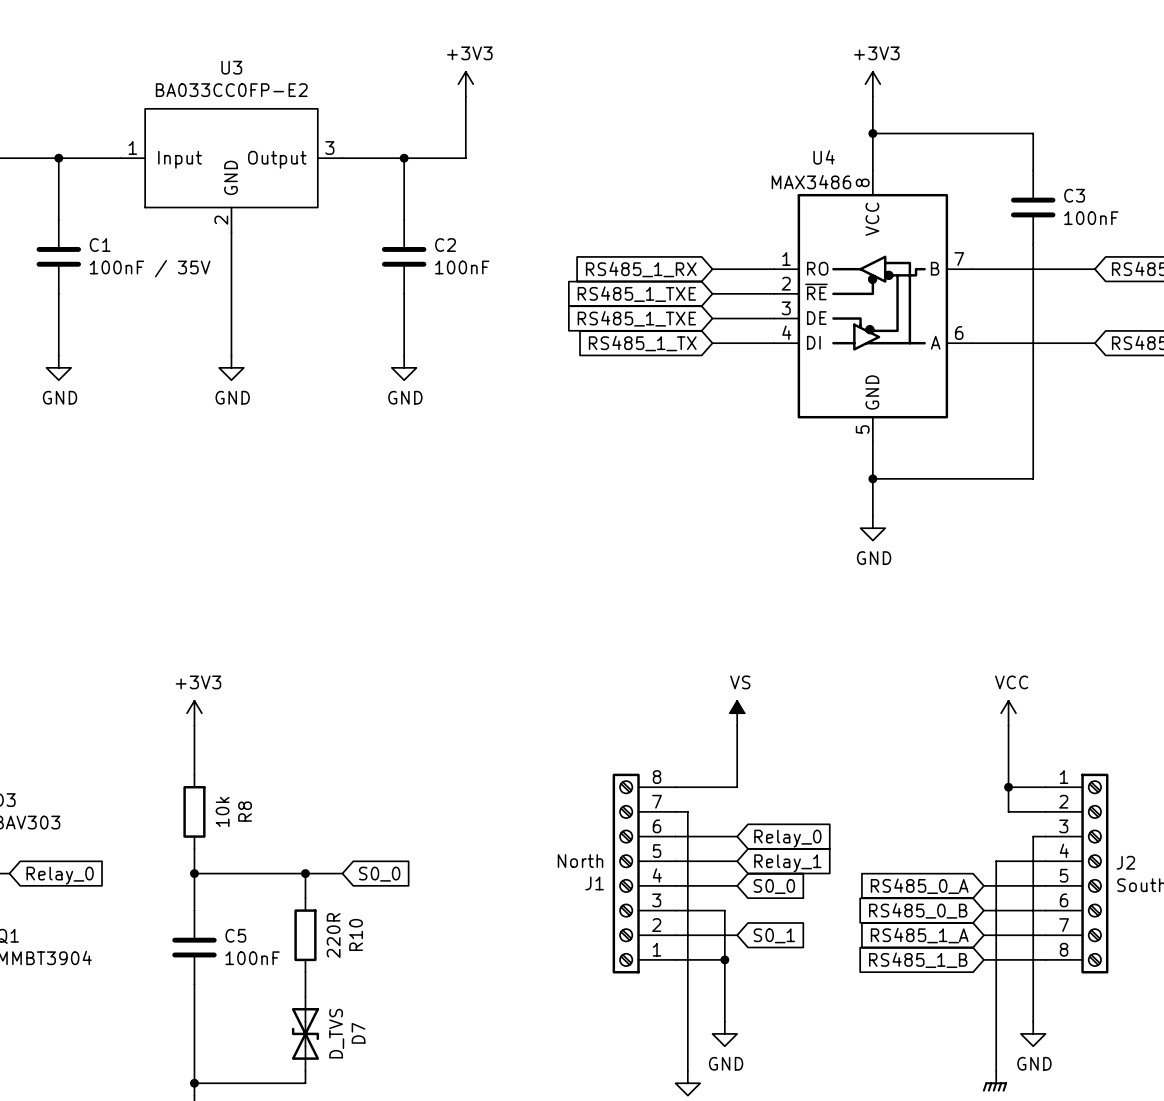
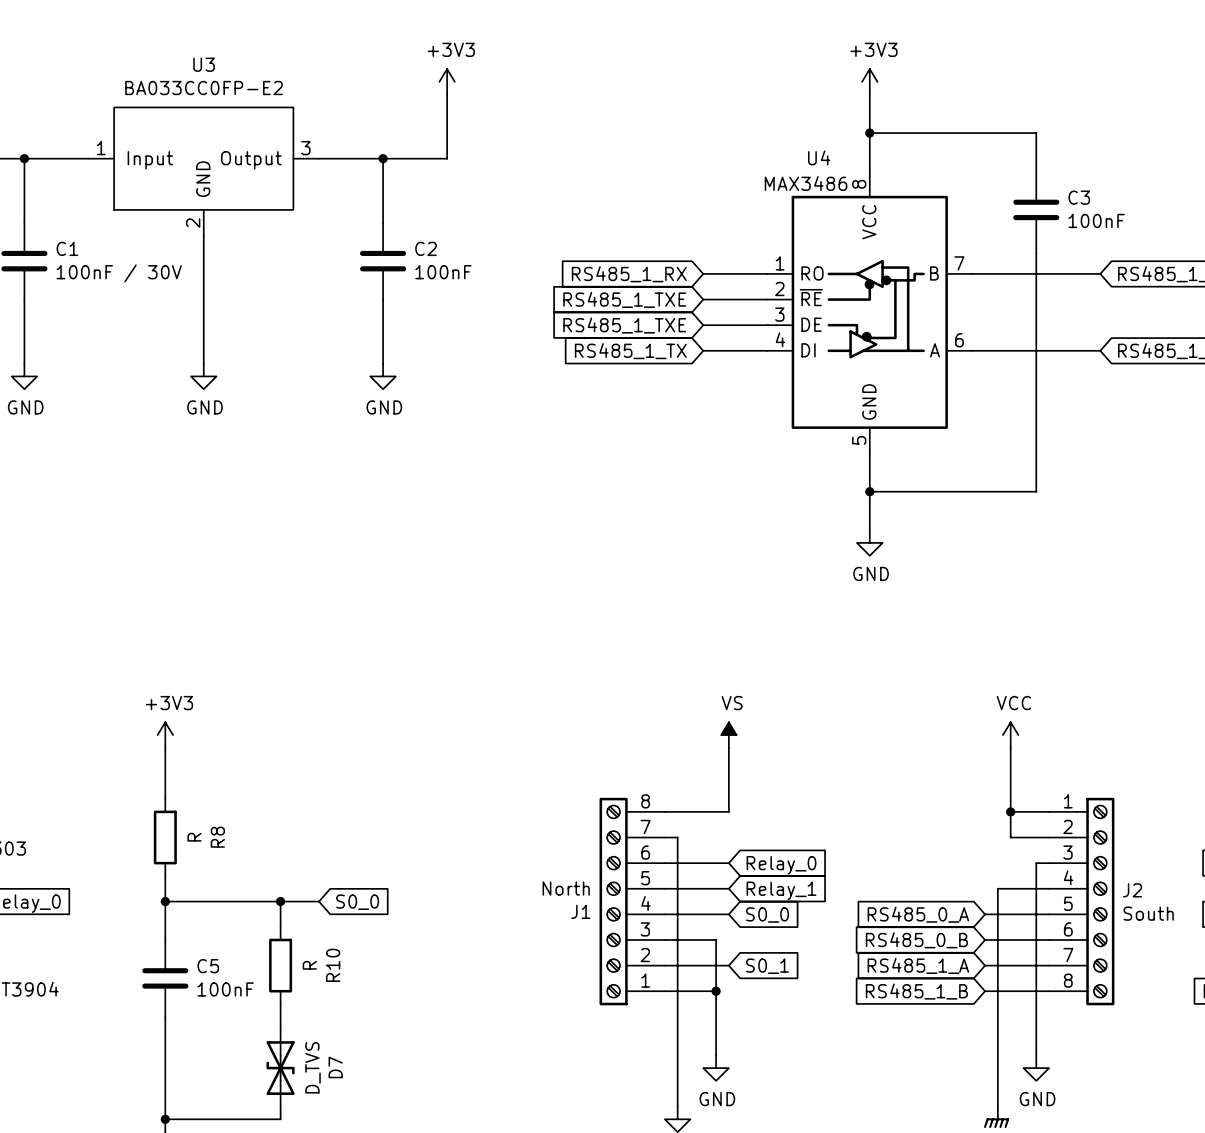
C1 value: 100nF / 35V (150, 268) -> 100nF / 30V (119, 273)
R8 value: 10k (222, 811) -> R (194, 837)
R10 value: 220R (333, 935) -> R (309, 965)

